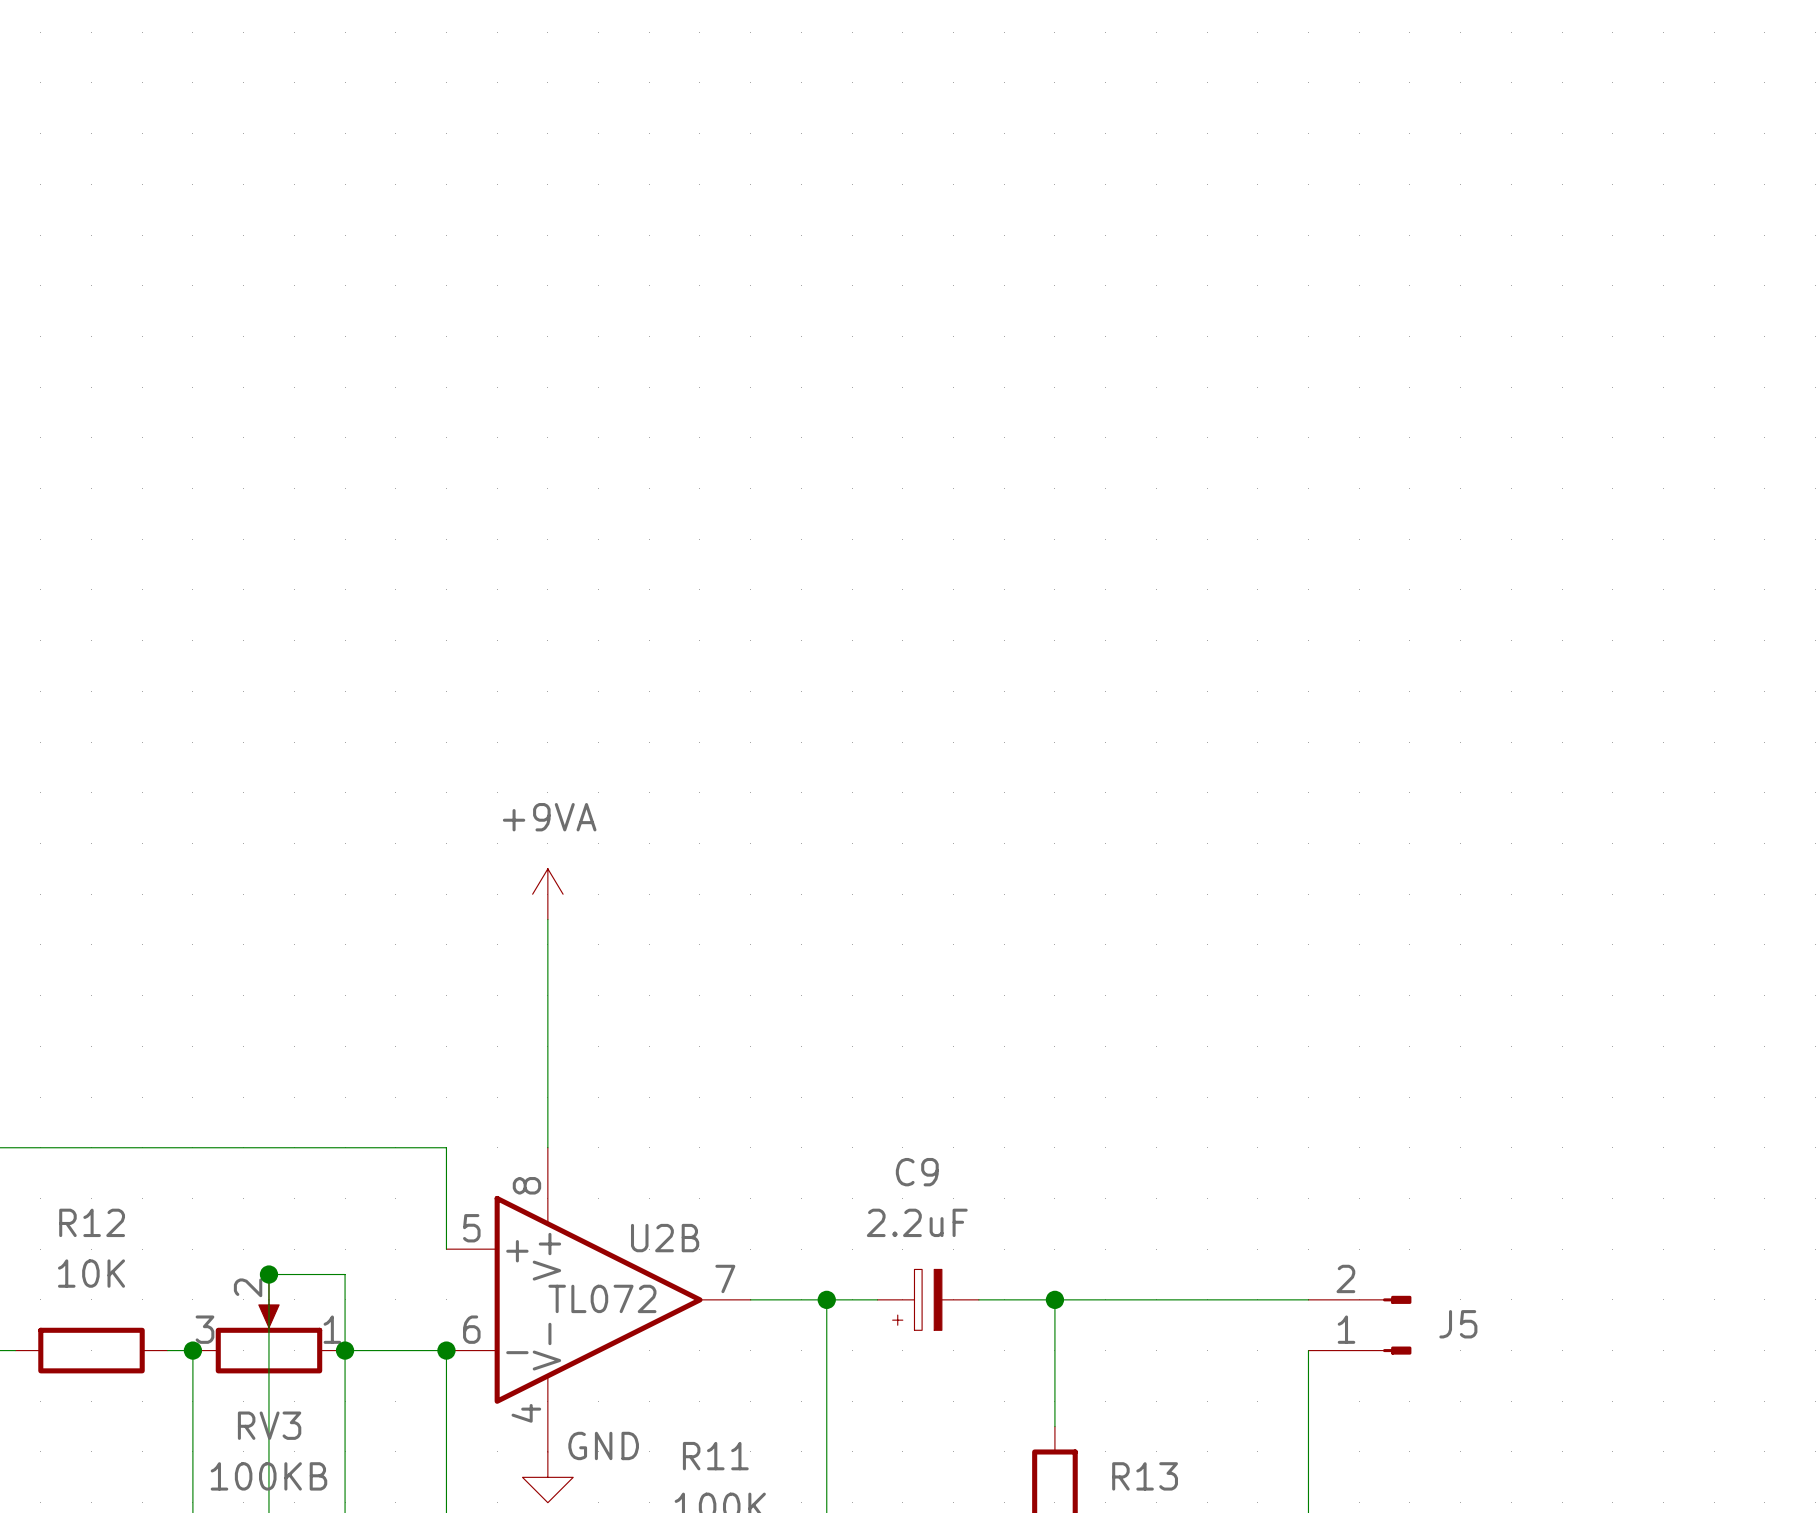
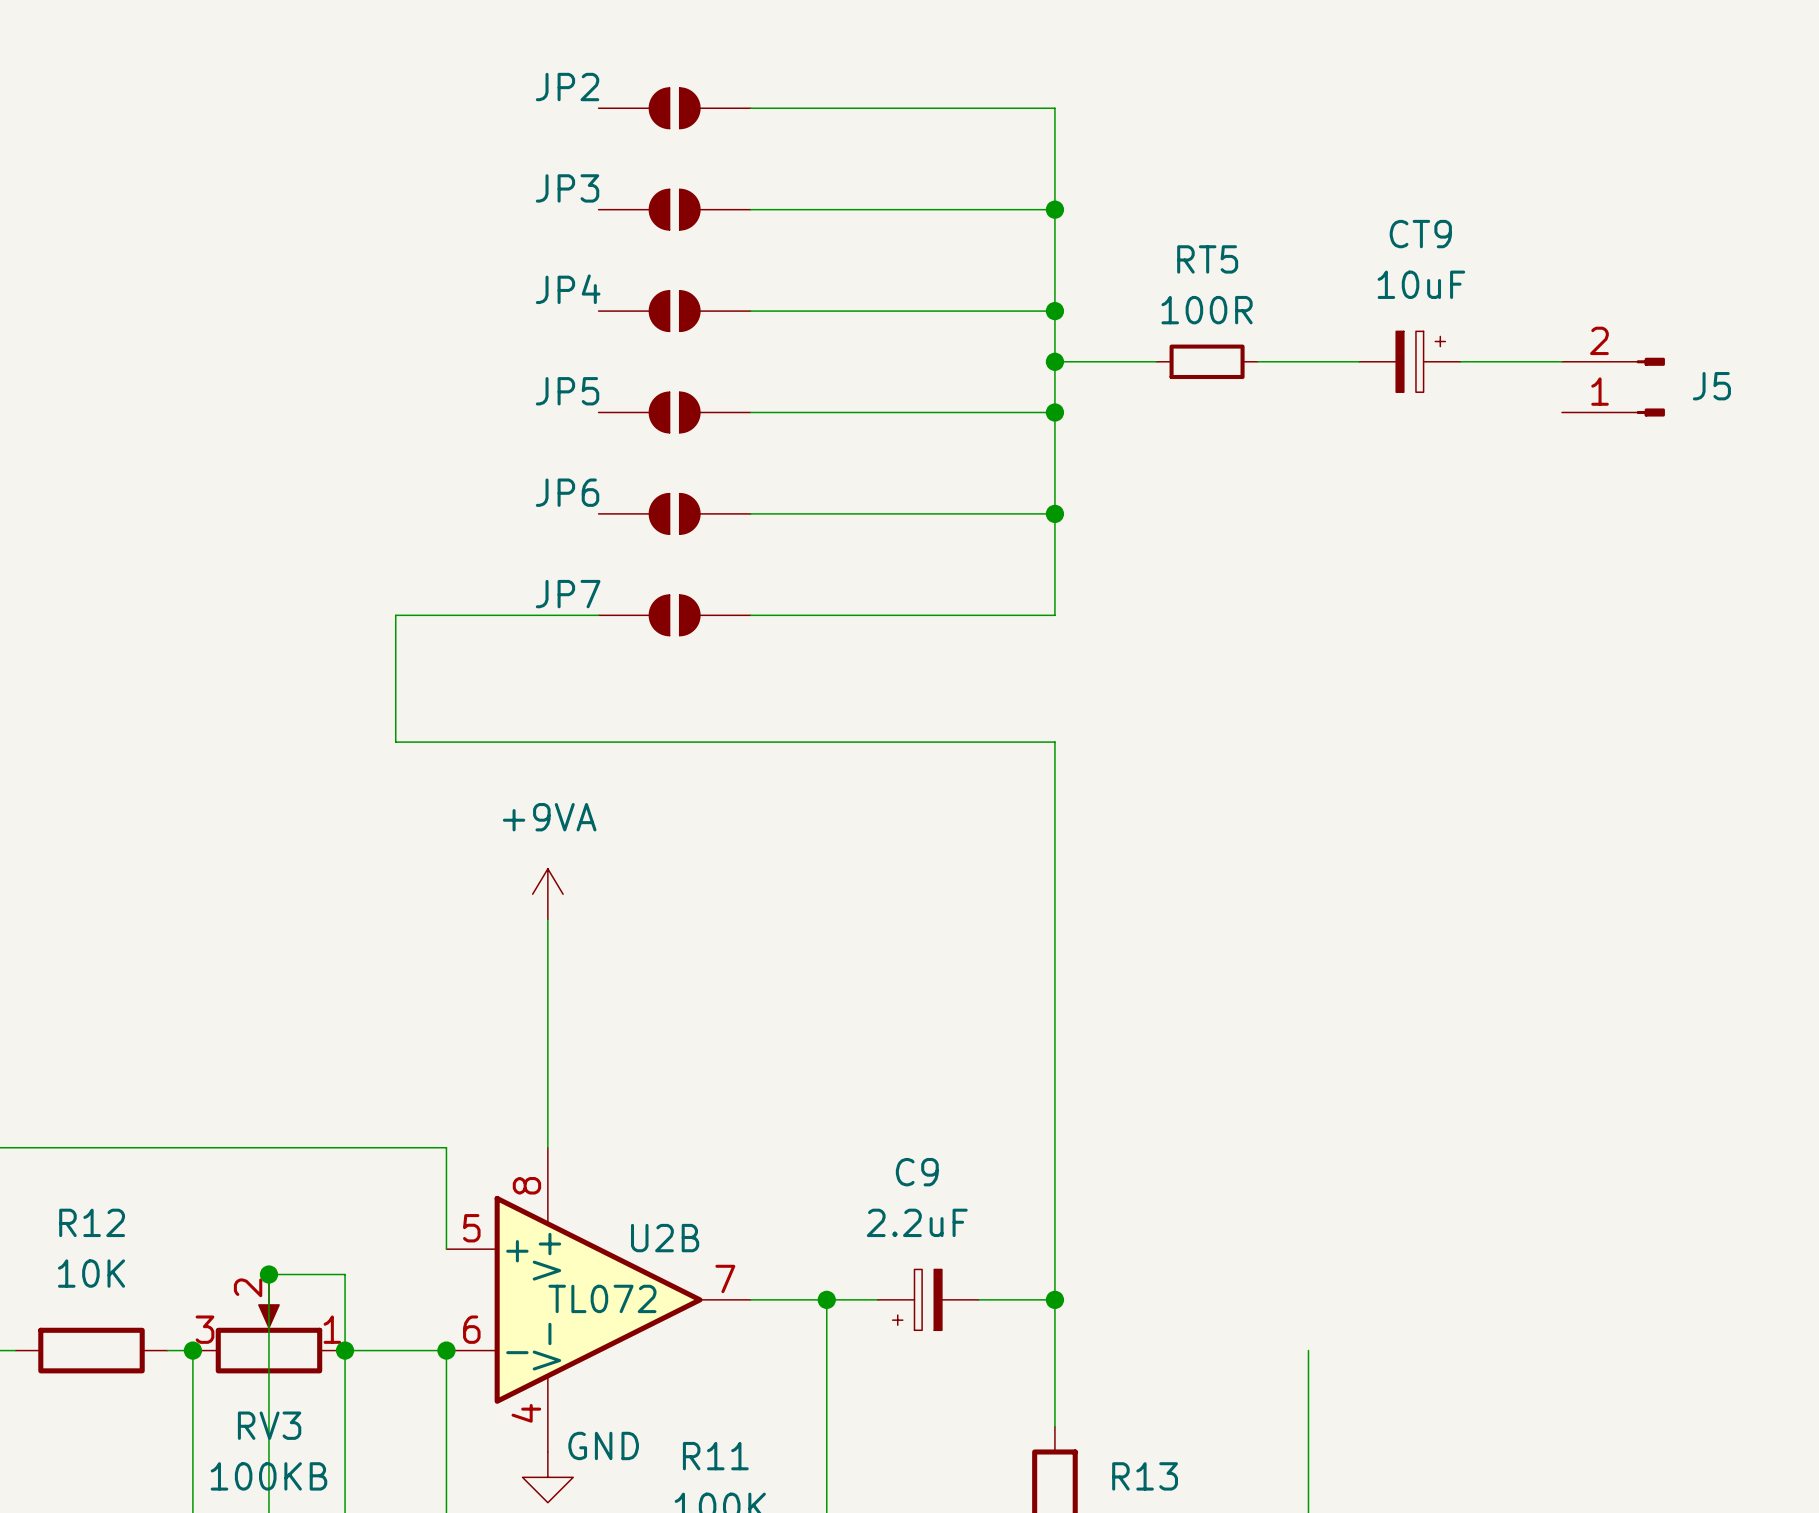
JP2: none -> (674, 108)
wire: none -> (750, 108) (1054, 108) (1054, 615) (750, 615)
JP3: none -> (674, 209)
wire: none -> (750, 209) (1054, 209)
junction: none -> (1054, 209)
JP4: none -> (674, 311)
wire: none -> (750, 311) (1054, 311)
junction: none -> (1054, 311)
wire: none -> (1054, 361) (1156, 361)
junction: none -> (1054, 361)
RT5: none -> 100R (1207, 361)
wire: none -> (1257, 361) (1359, 361)
CT9: none -> 10uF (1409, 361)
wire: none -> (1460, 361) (1562, 361)
JP5: none -> (674, 412)
wire: none -> (750, 412) (1054, 412)
junction: none -> (1054, 412)
JP6: none -> (674, 513)
wire: none -> (750, 513) (1054, 513)
junction: none -> (1054, 513)
JP7: none -> (674, 615)
wire: (1054, 1299) (1308, 1299) -> (1054, 1299) (1054, 742) (395, 742) (395, 615) (598, 615)
J5 position: (1359, 1325) -> (1613, 387)

